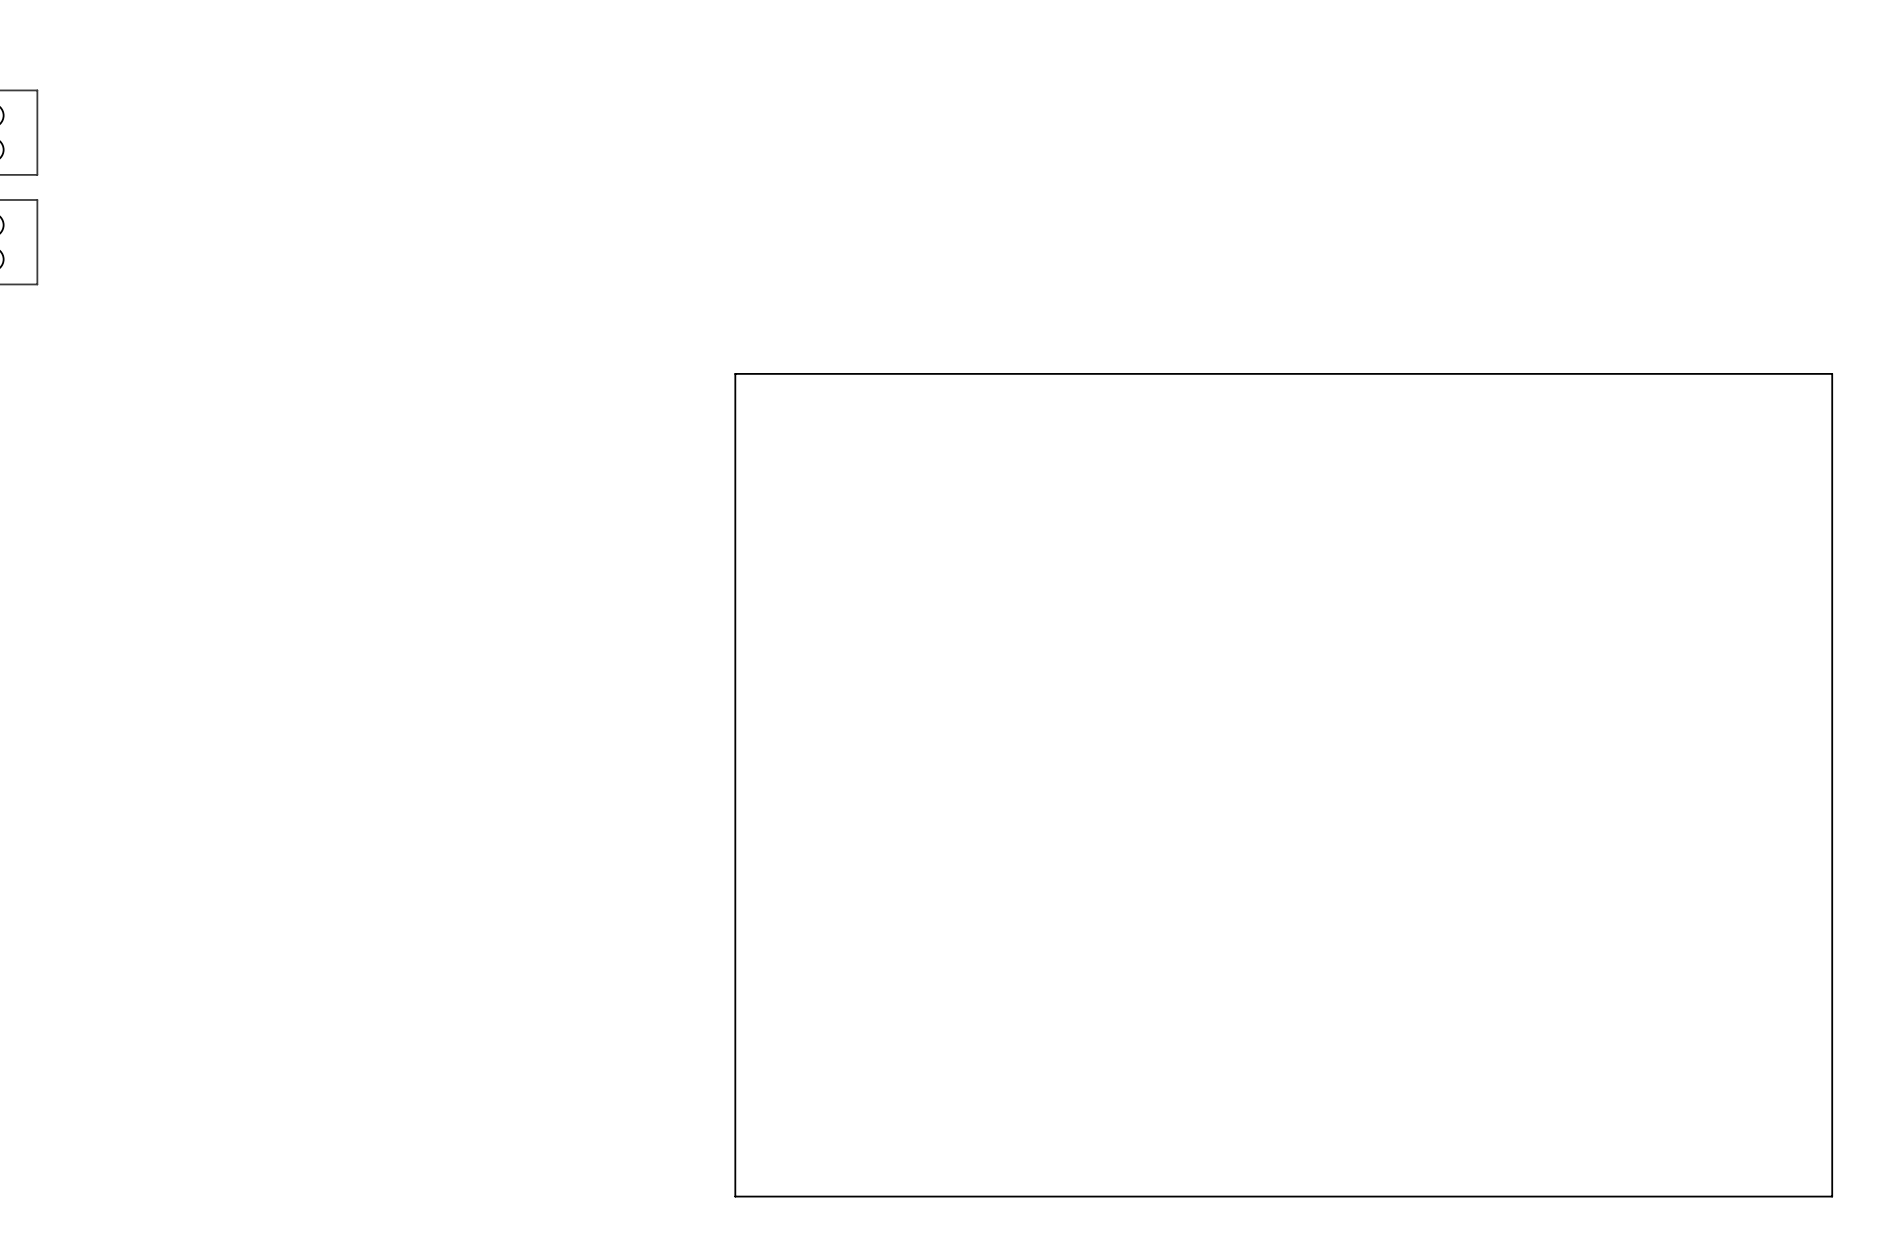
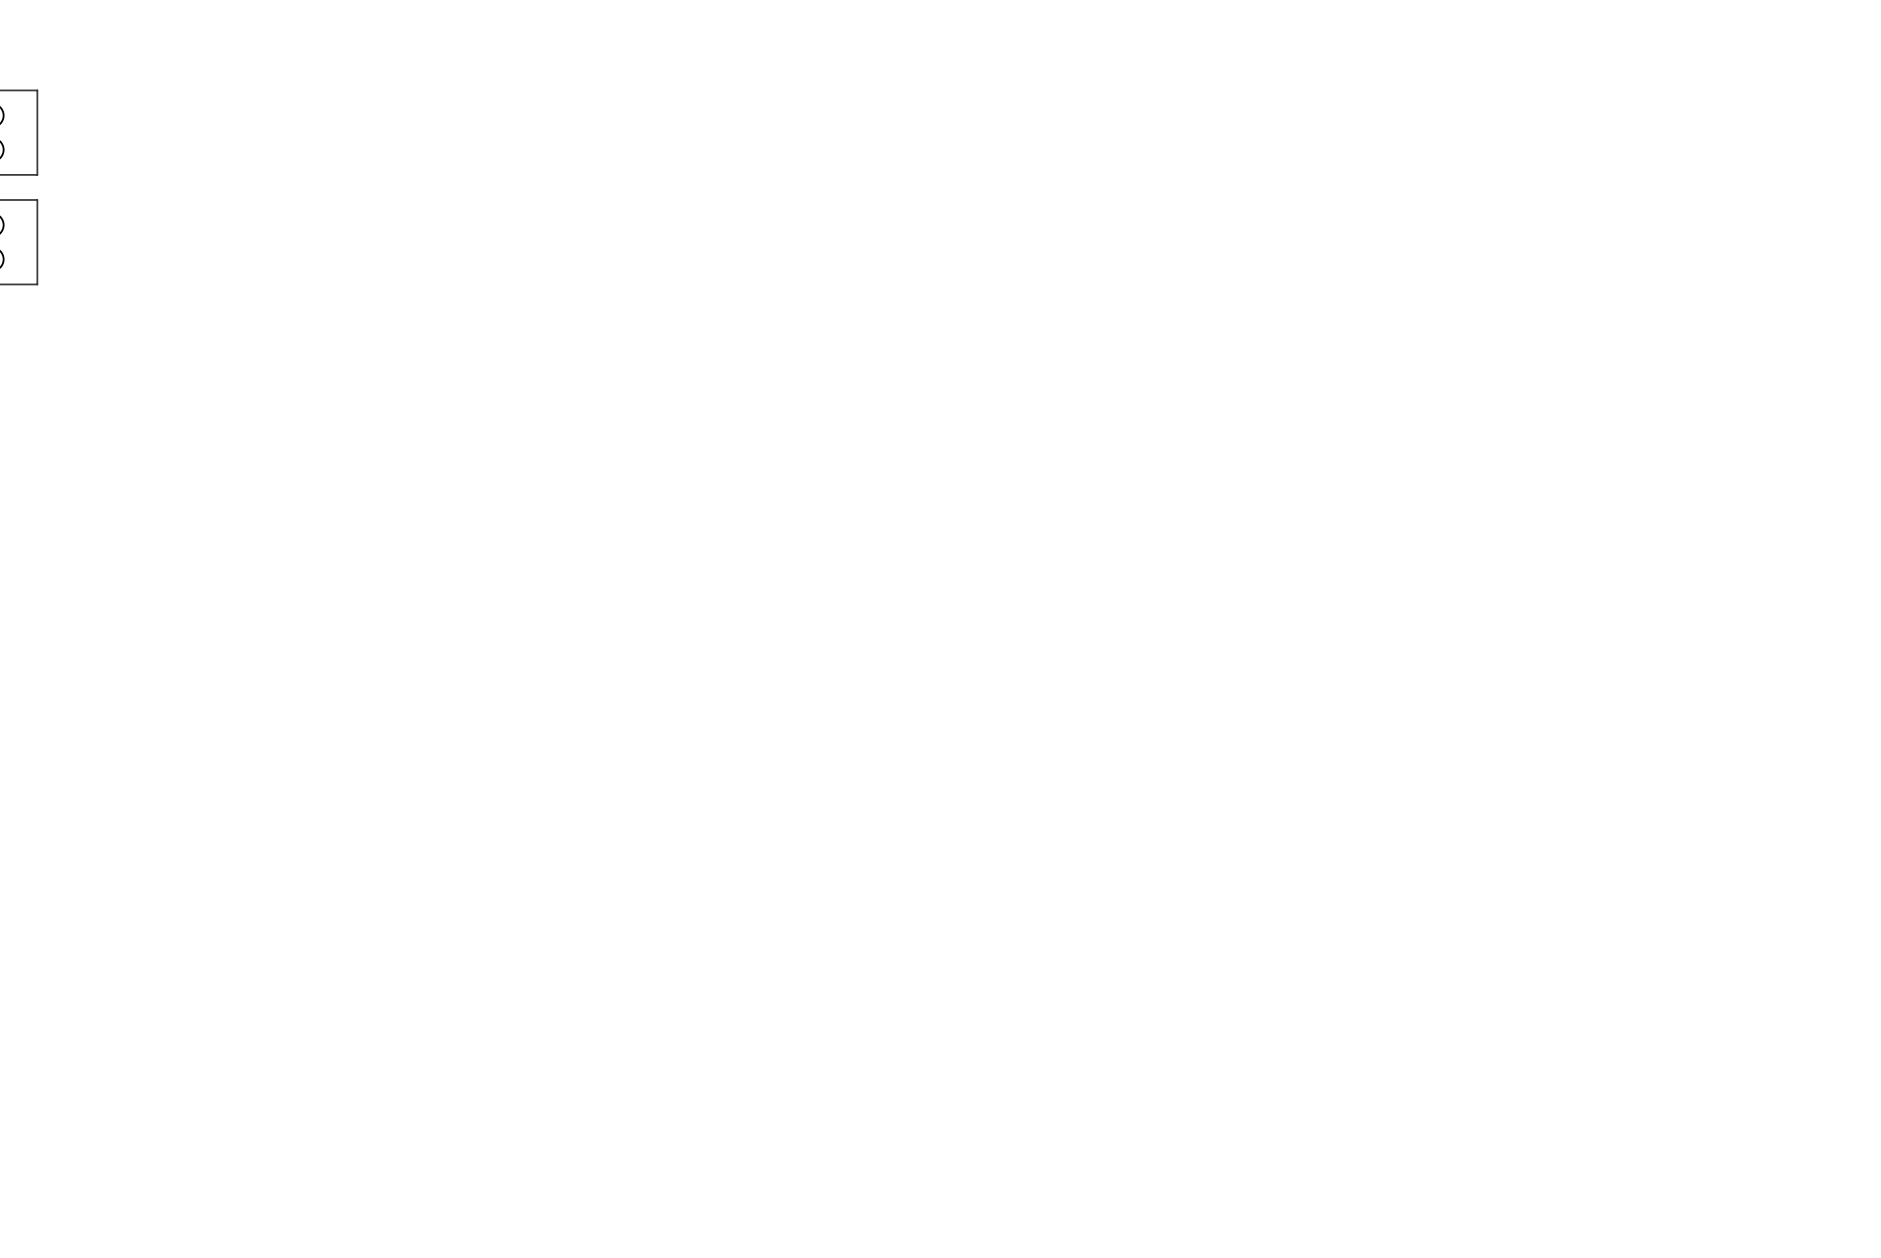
board edge: (735, 373) (1832, 373) (1832, 1196) (735, 1196) (735, 373) -> none

